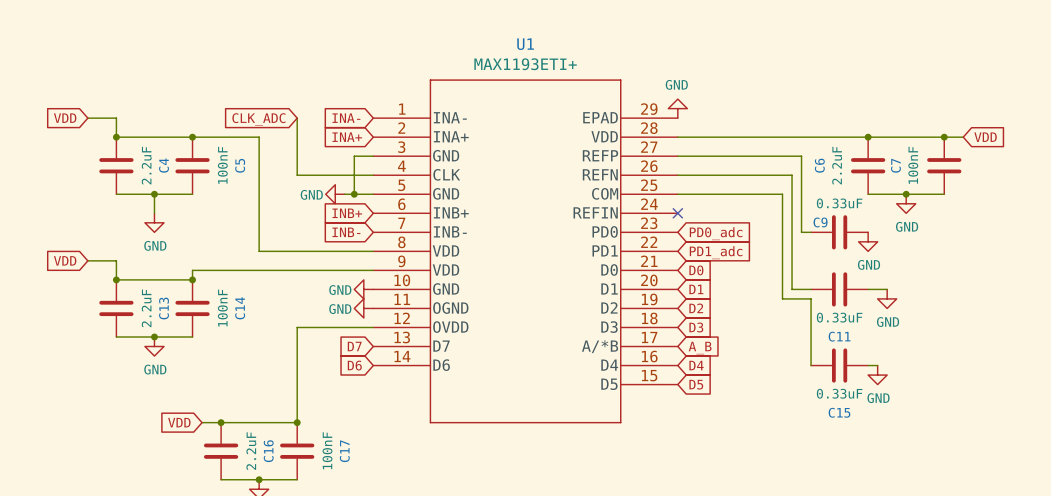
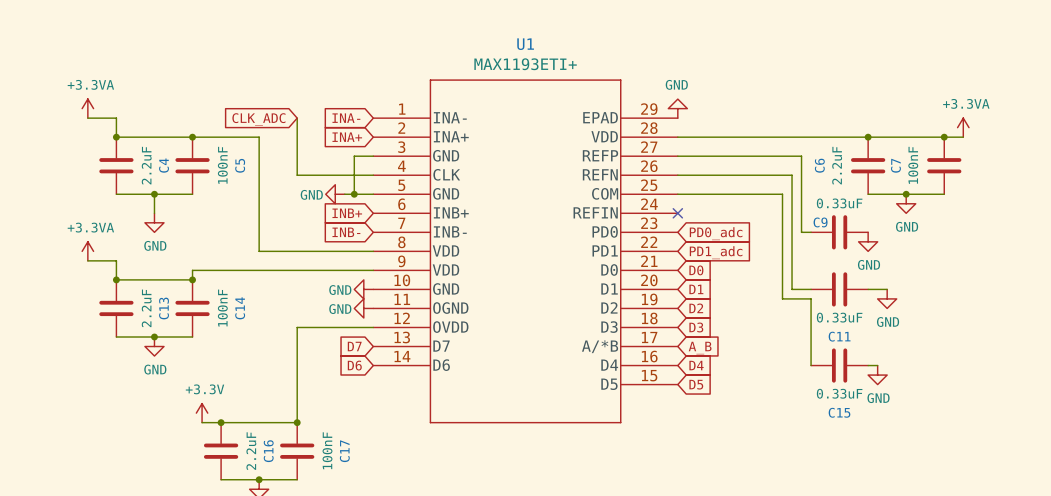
power symbol: none -> +3.3VA (87, 108)
global label: VDD (65, 118) -> none
power symbol: none -> +3.3VA (963, 127)
global label: VDD (985, 137) -> none
power symbol: none -> +3.3VA (87, 251)
global label: VDD (65, 260) -> none
power symbol: none -> +3.3V (202, 413)
global label: VDD (179, 422) -> none

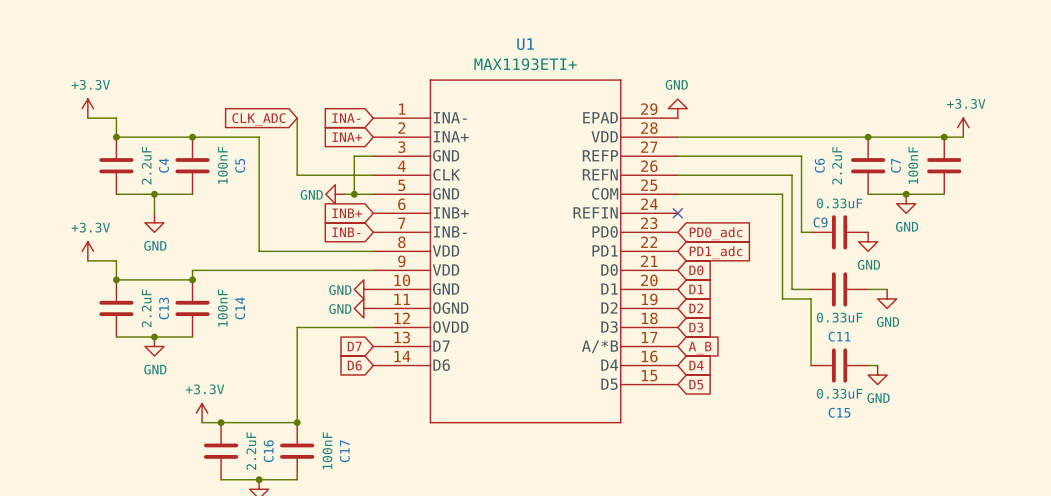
power symbol: +3.3VA (87, 108) -> +3.3V (87, 108)
power symbol: +3.3VA (963, 127) -> +3.3V (963, 127)
power symbol: +3.3VA (87, 251) -> +3.3V (87, 251)

